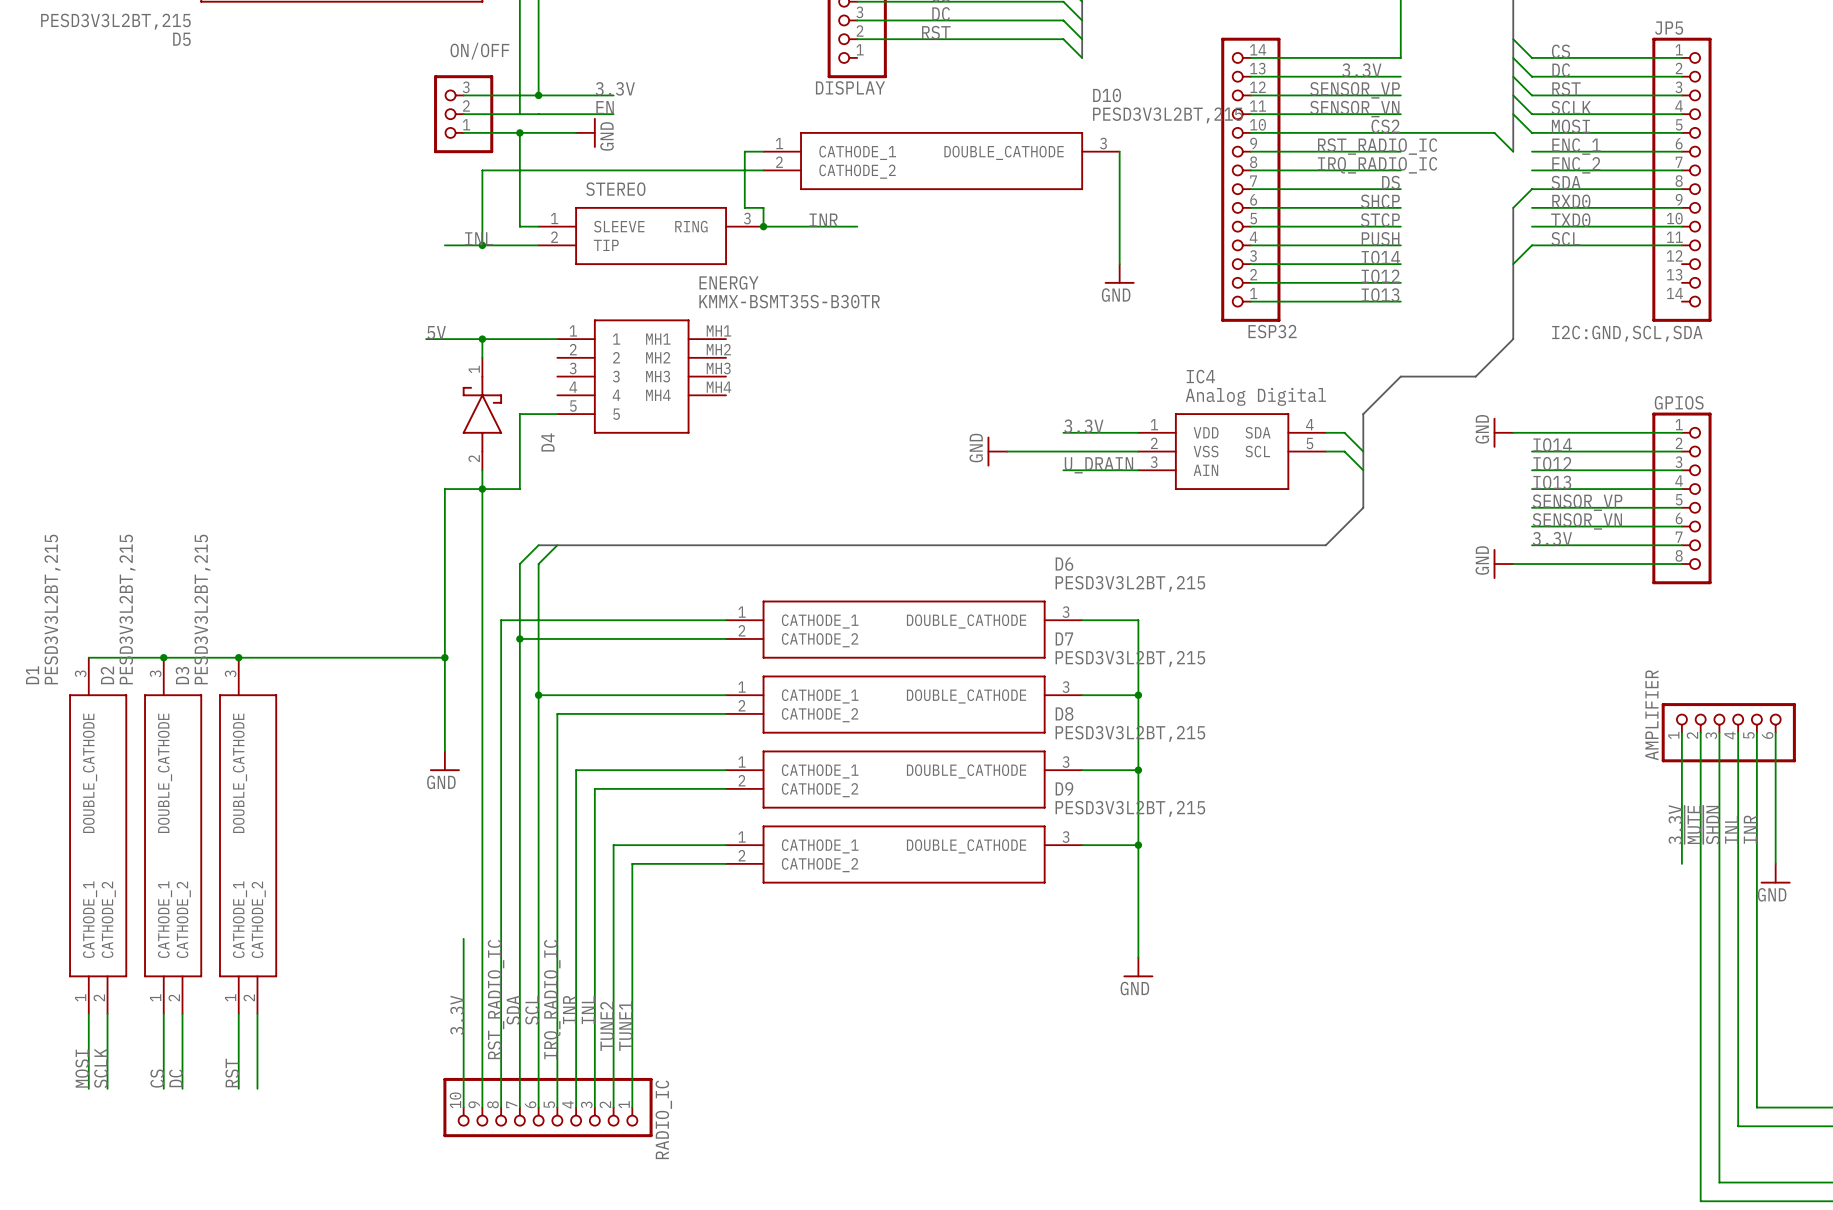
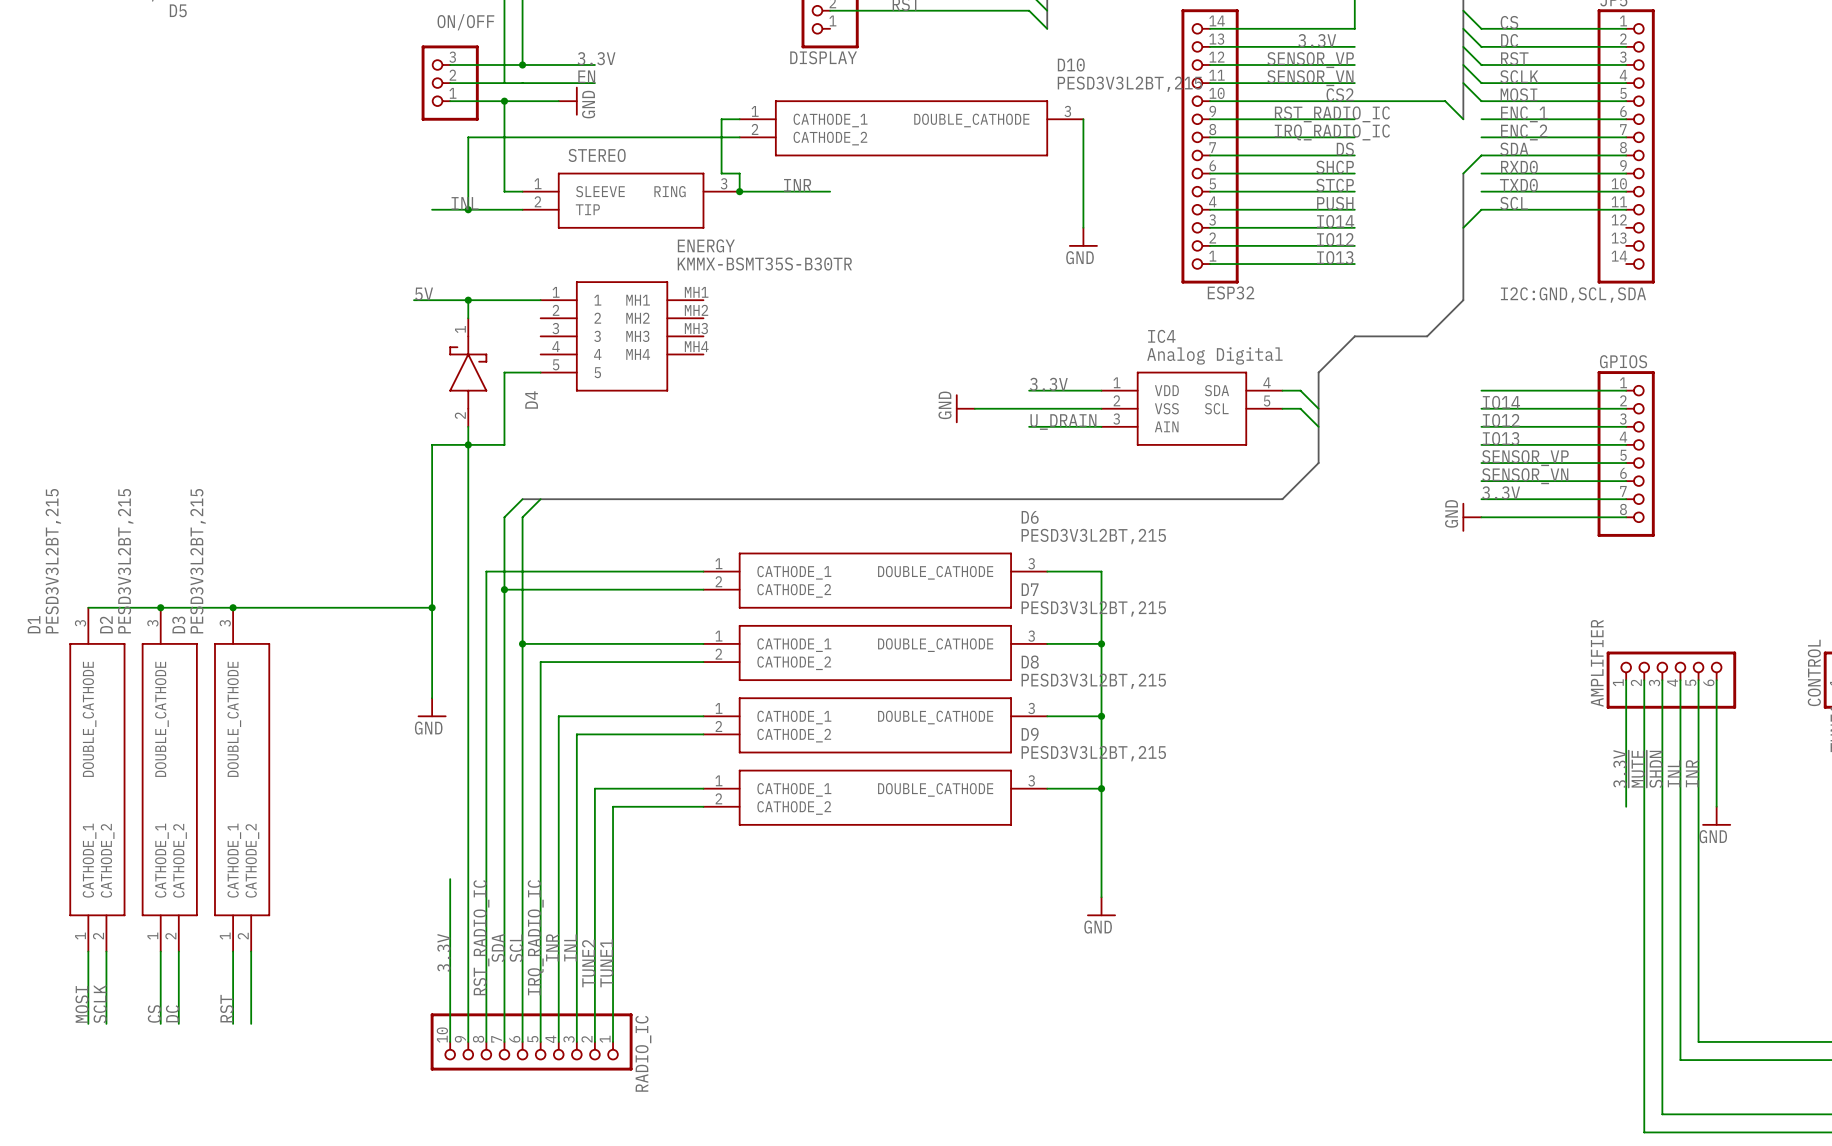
power symbol: GND (1503, 432) -> none
wire: (1513, 432) (1531, 432) -> none
power symbol position: GND (1503, 564) -> GND (1471, 517)

